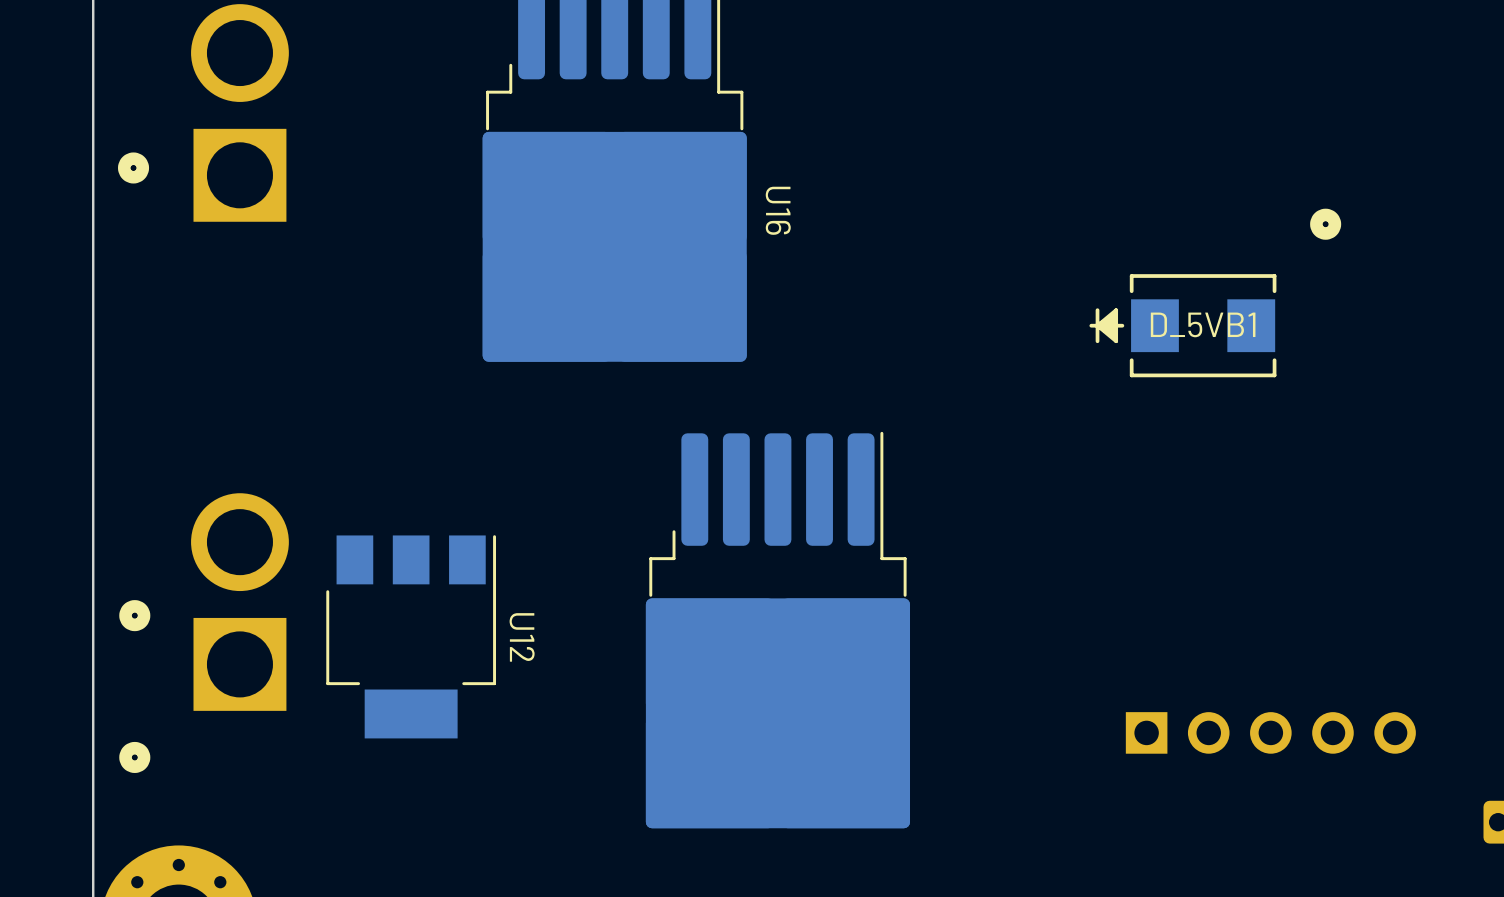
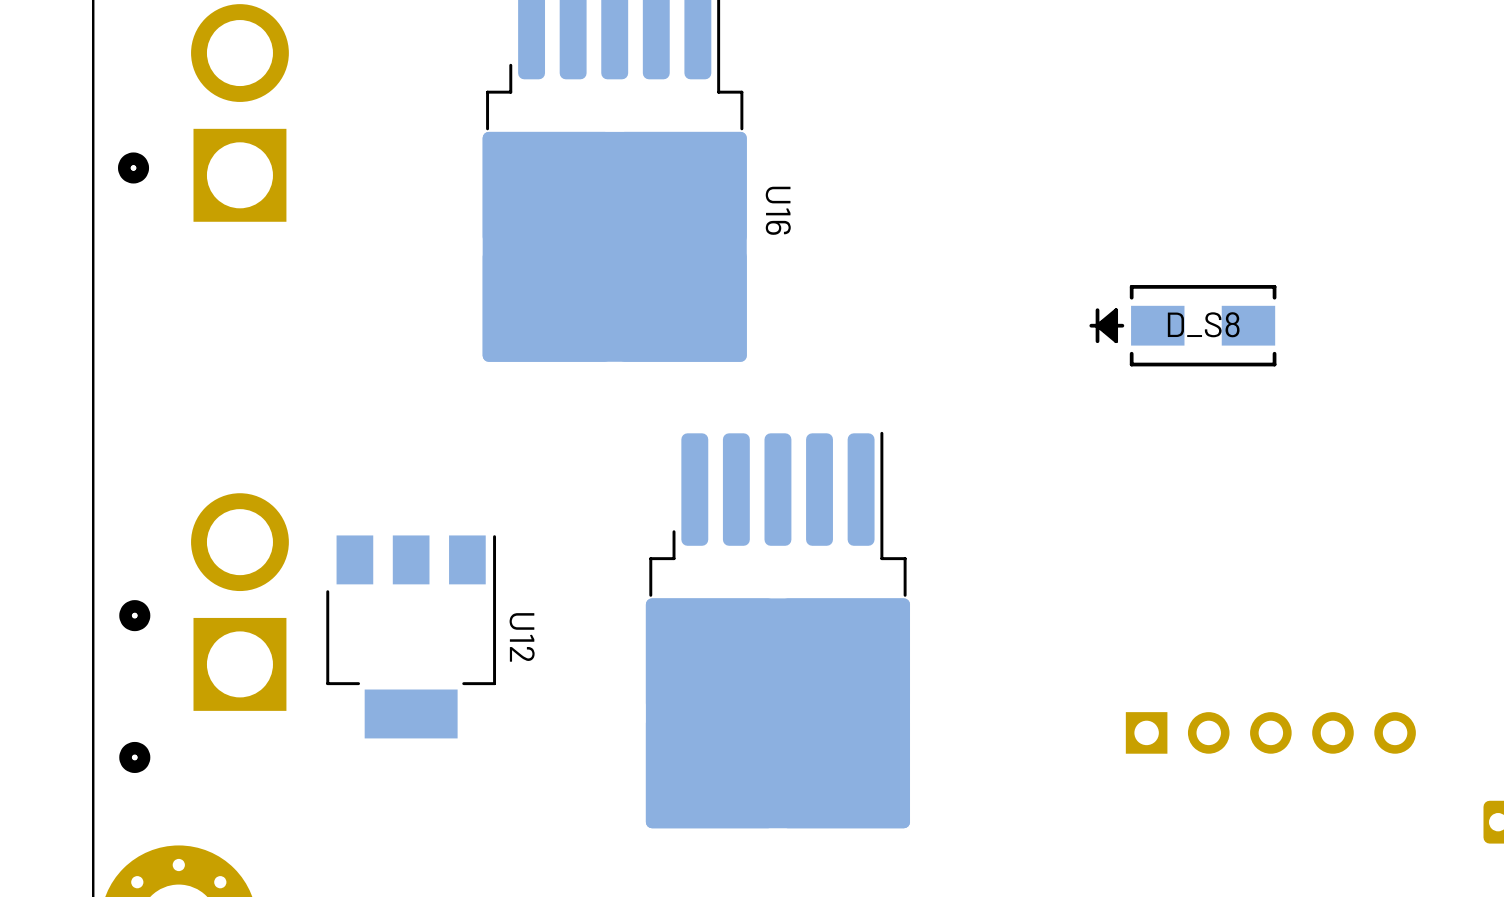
part: (1325, 224) -> none
D_5VB1: (1182, 325) -> none
D_S8: none -> (1182, 325)

